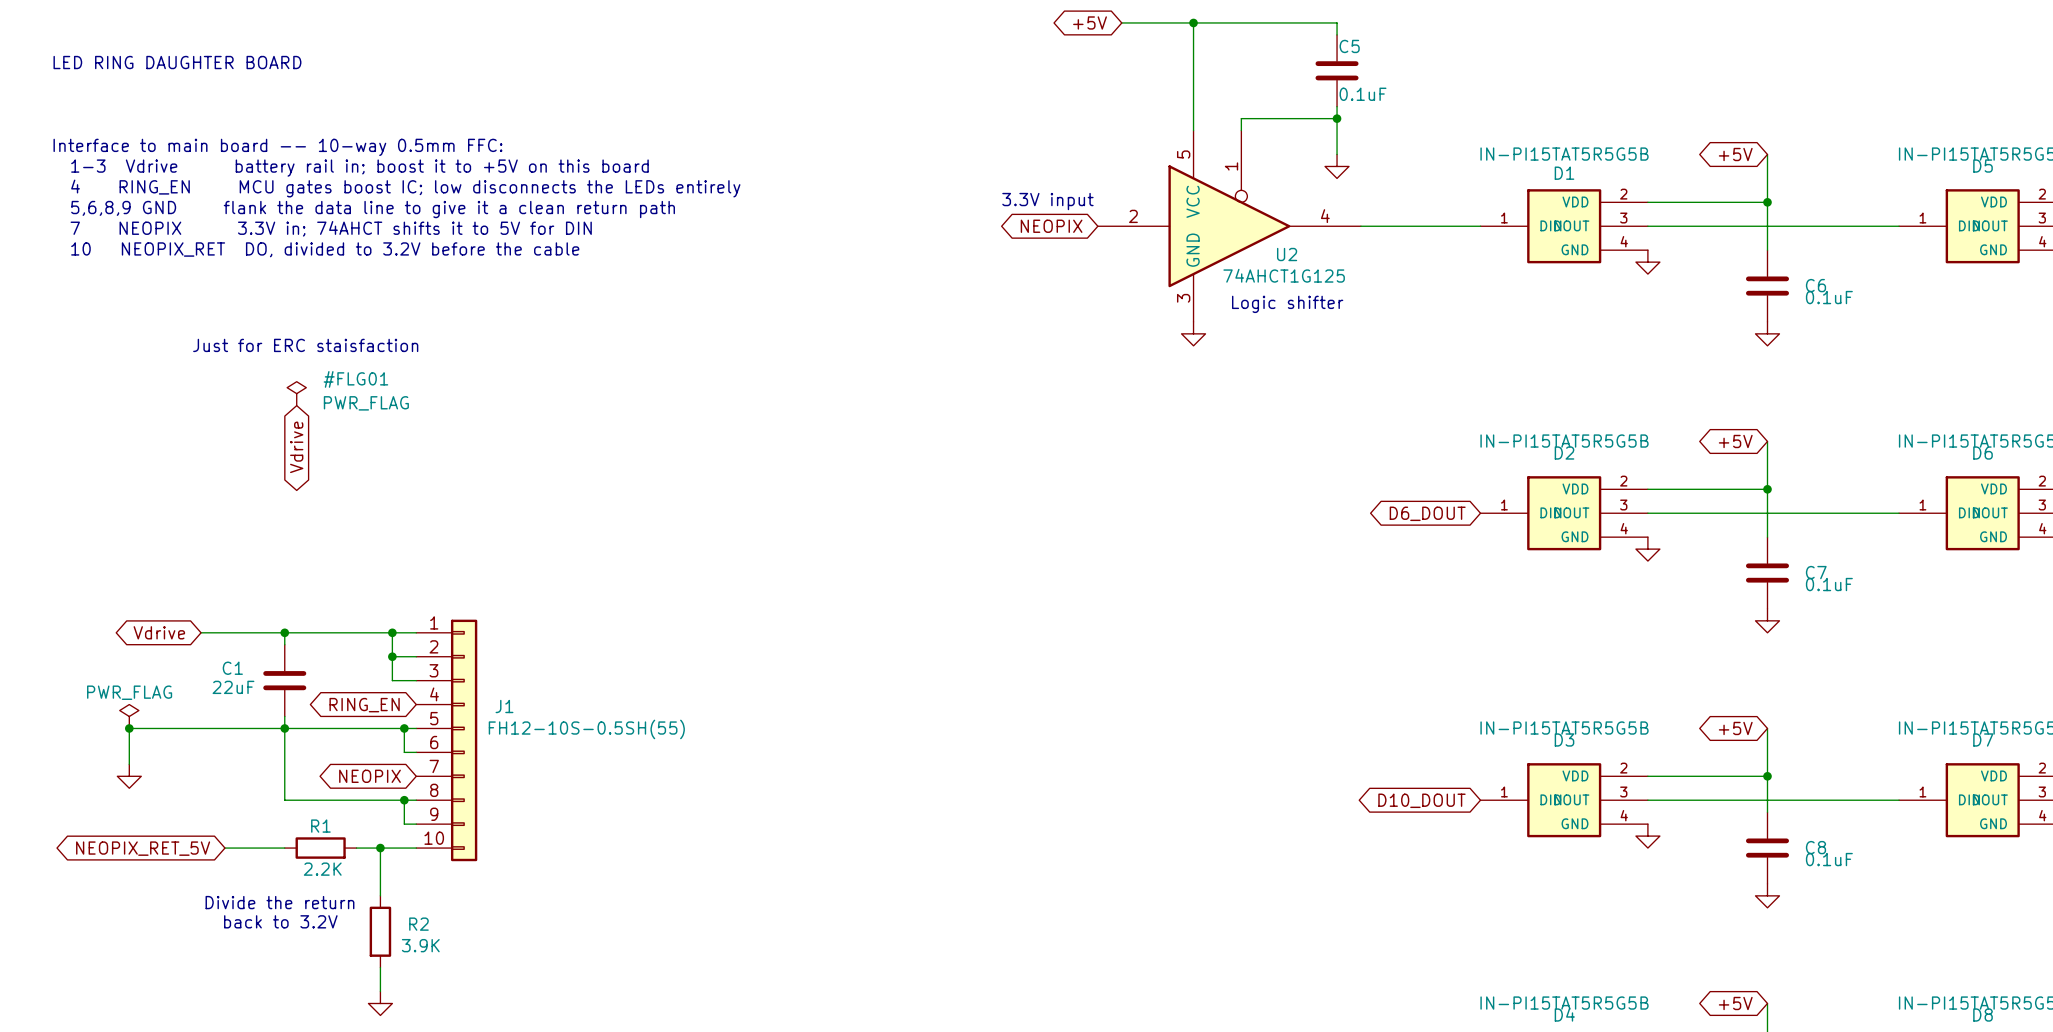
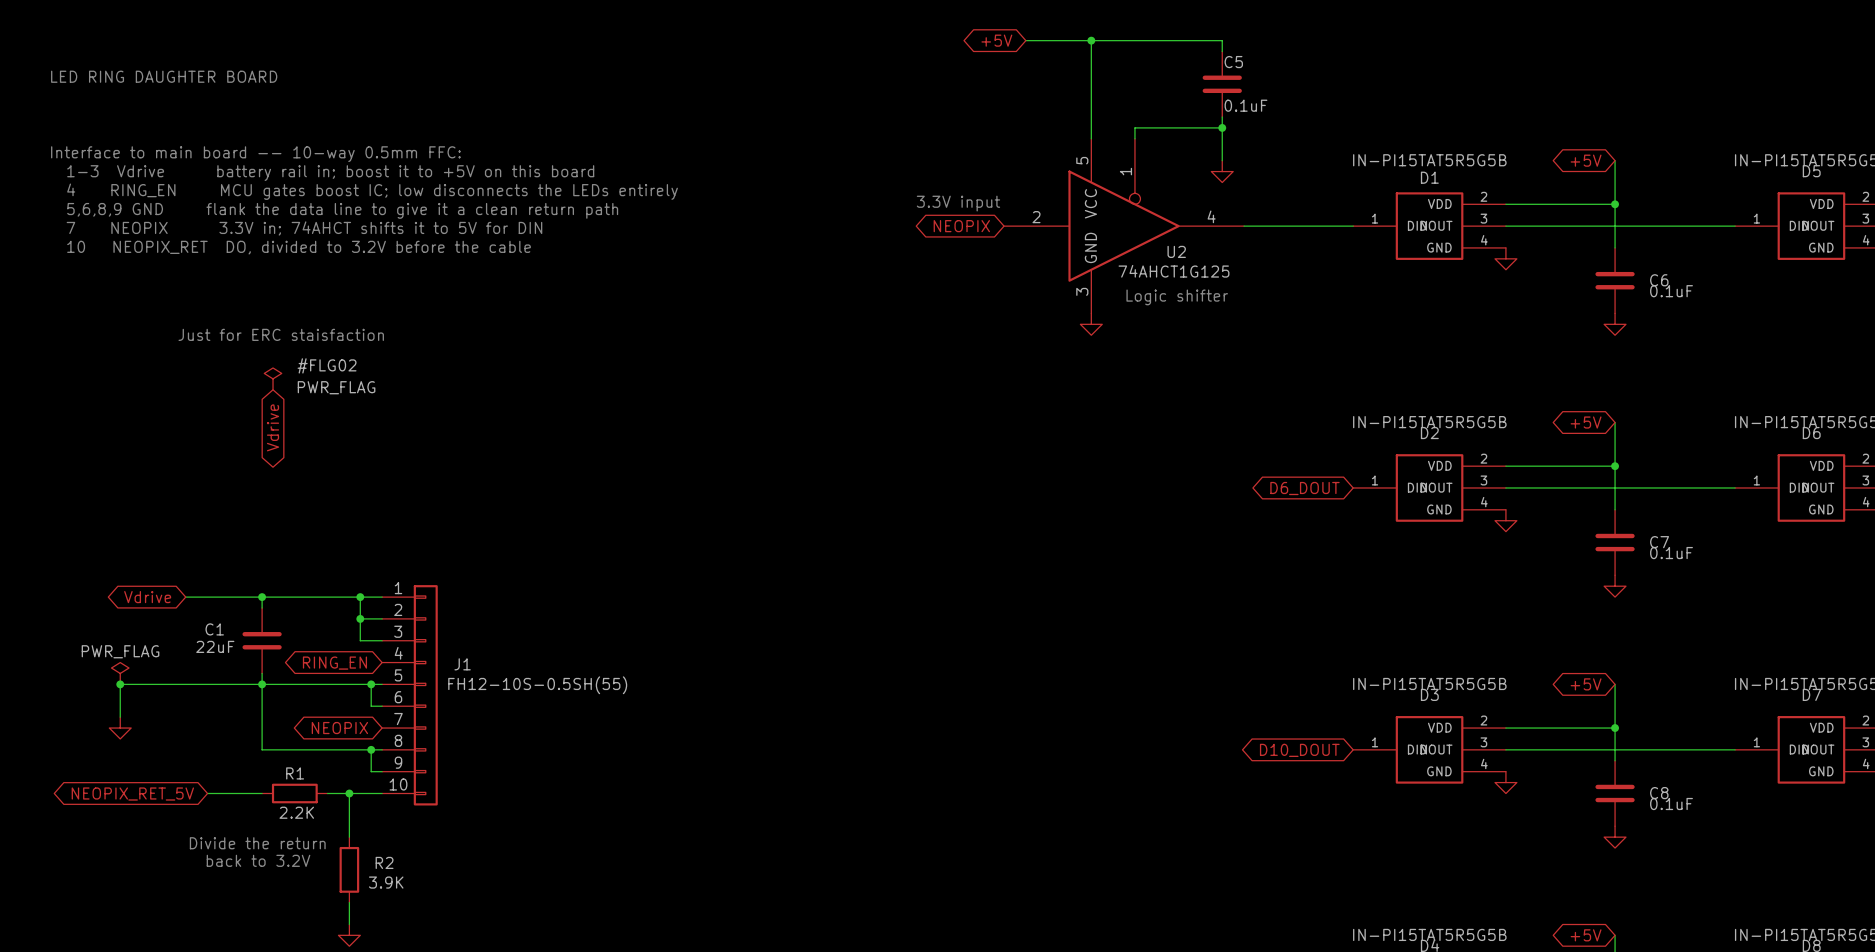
#FLG01 name: #FLG01 (355, 379) -> #FLG02 (327, 365)

